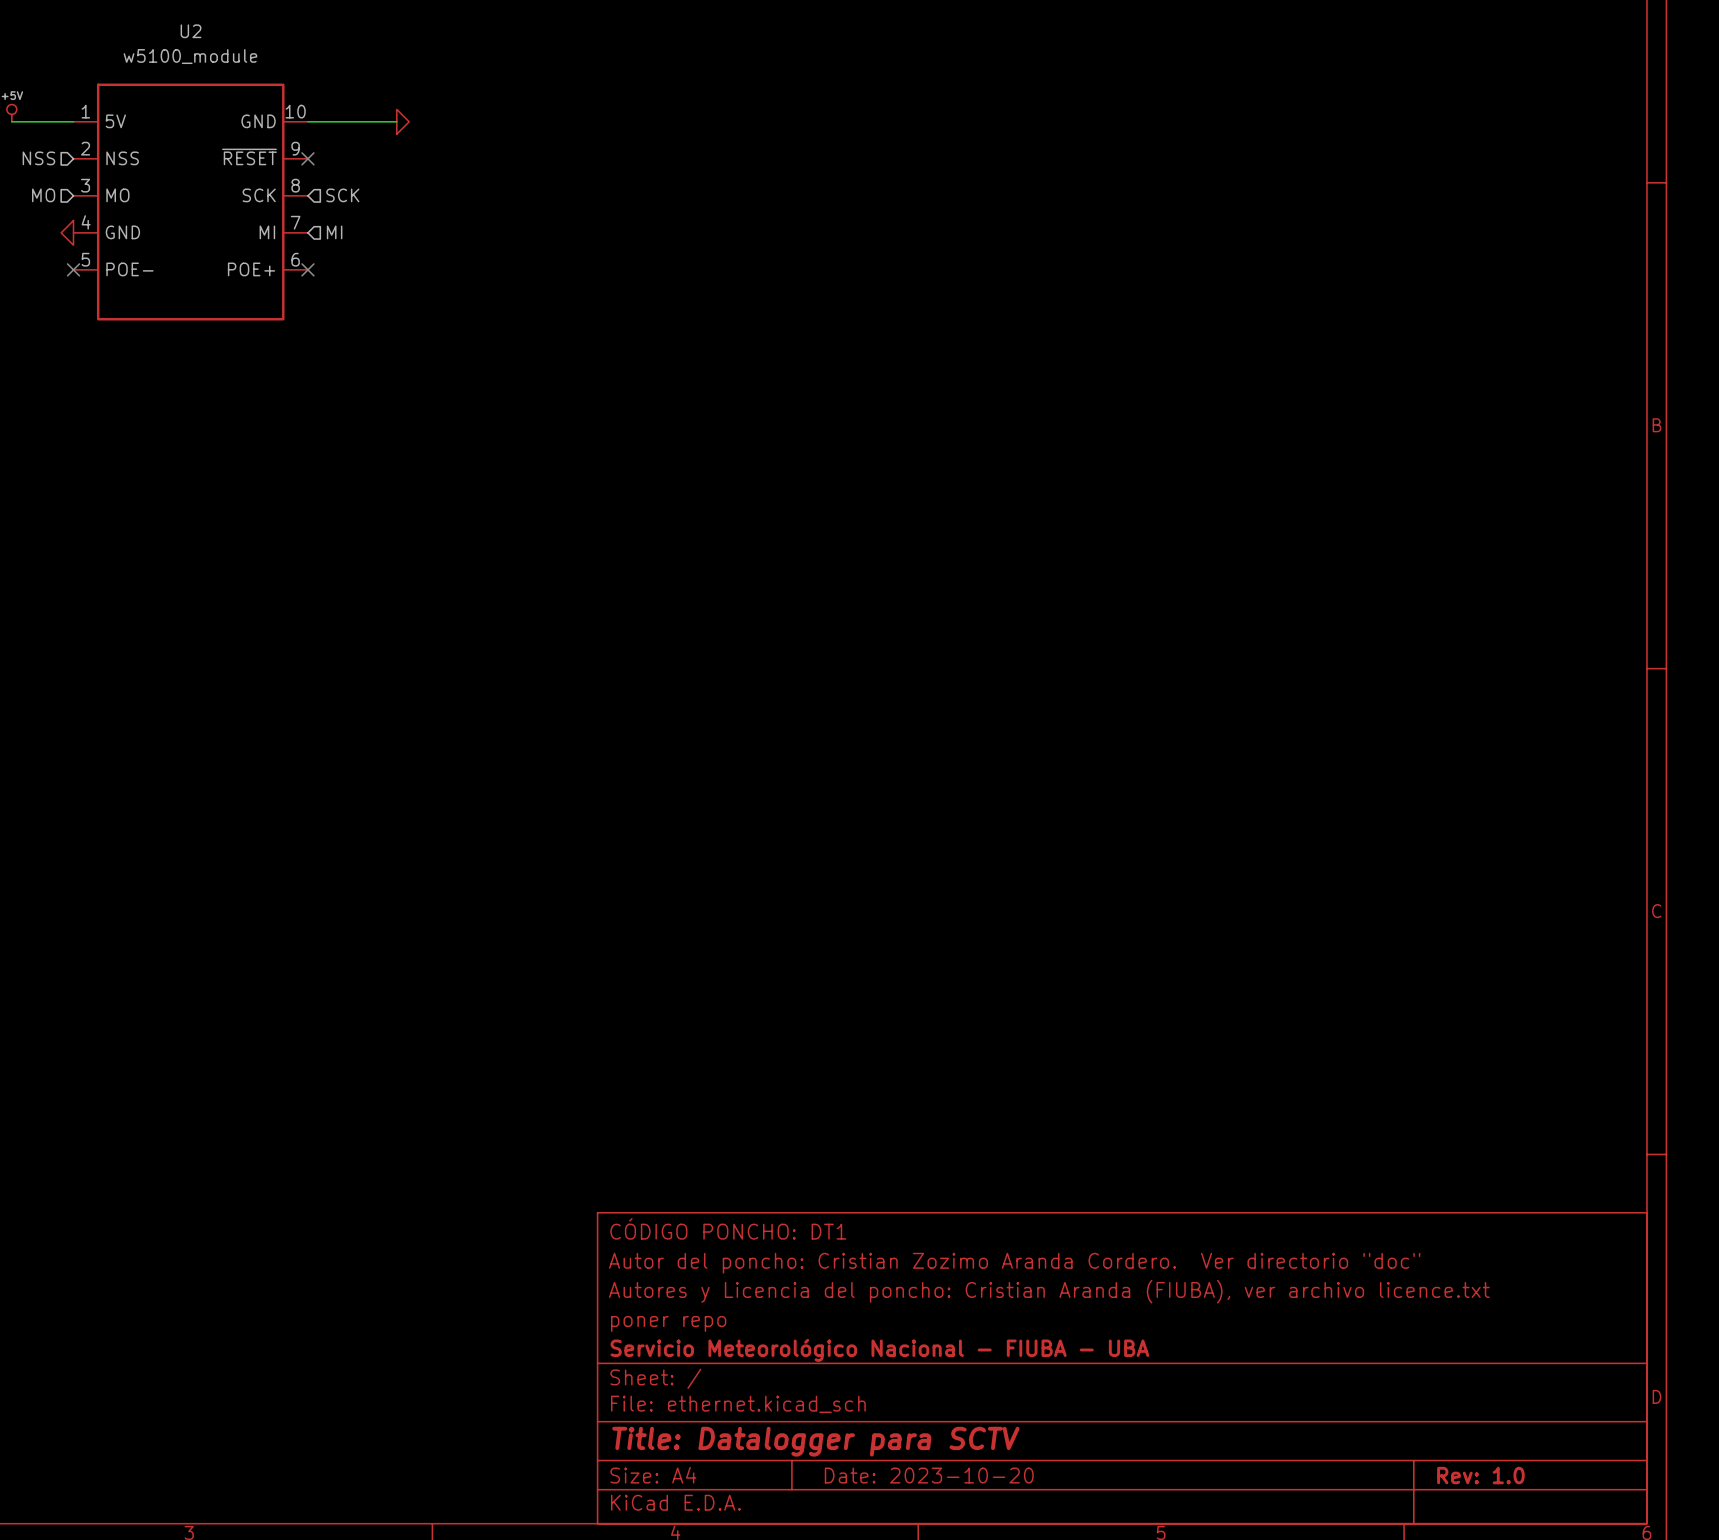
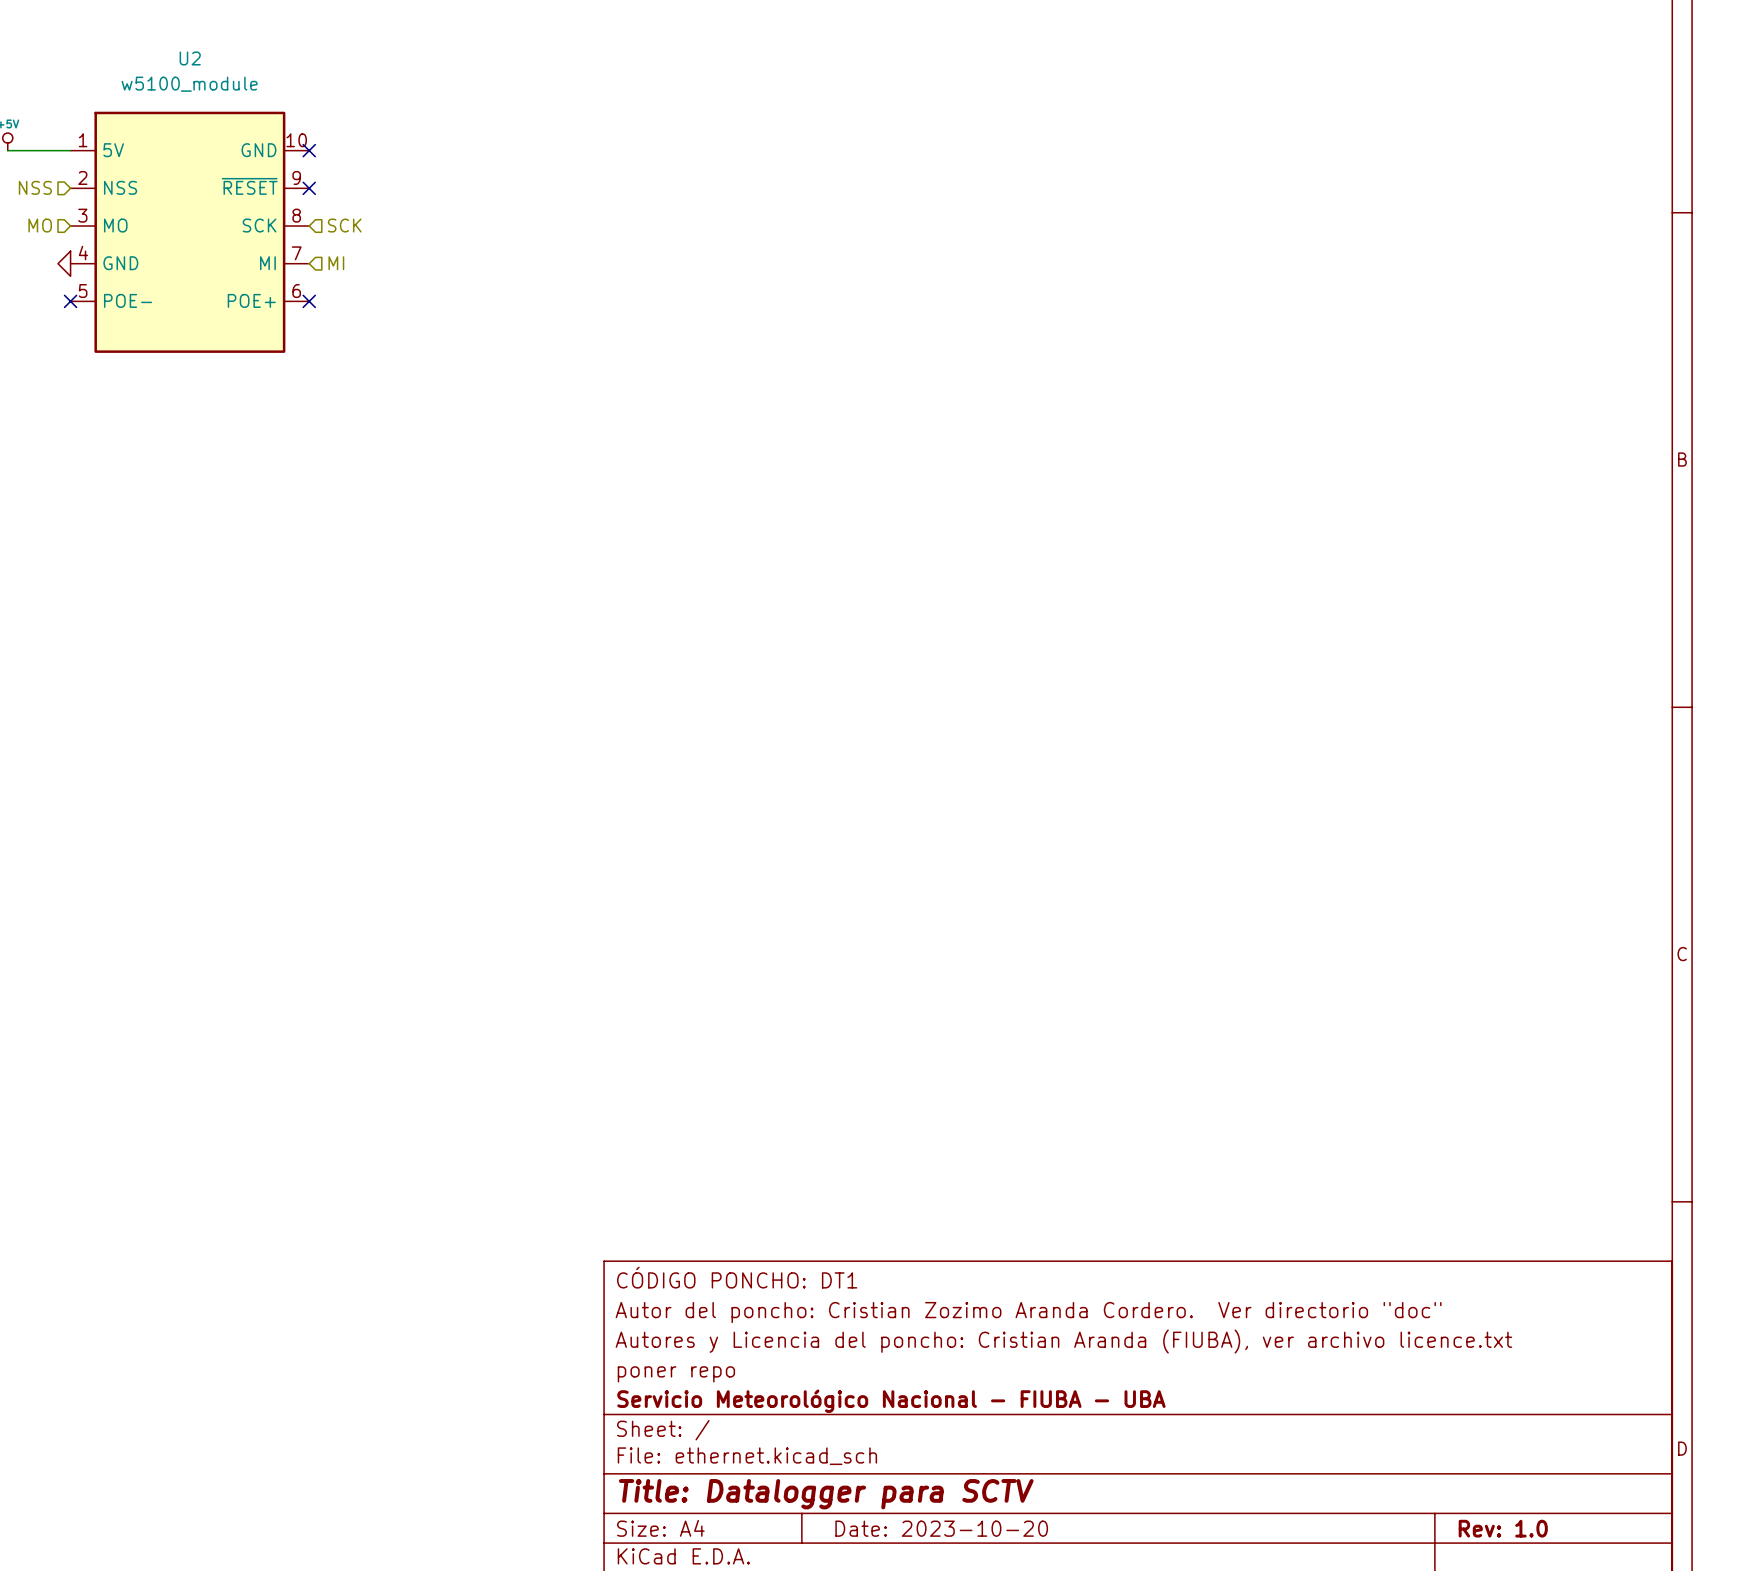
wire: (307, 121) (396, 121) -> none
no-connect mark: none -> (309, 150)
power symbol: (402, 121) -> none

